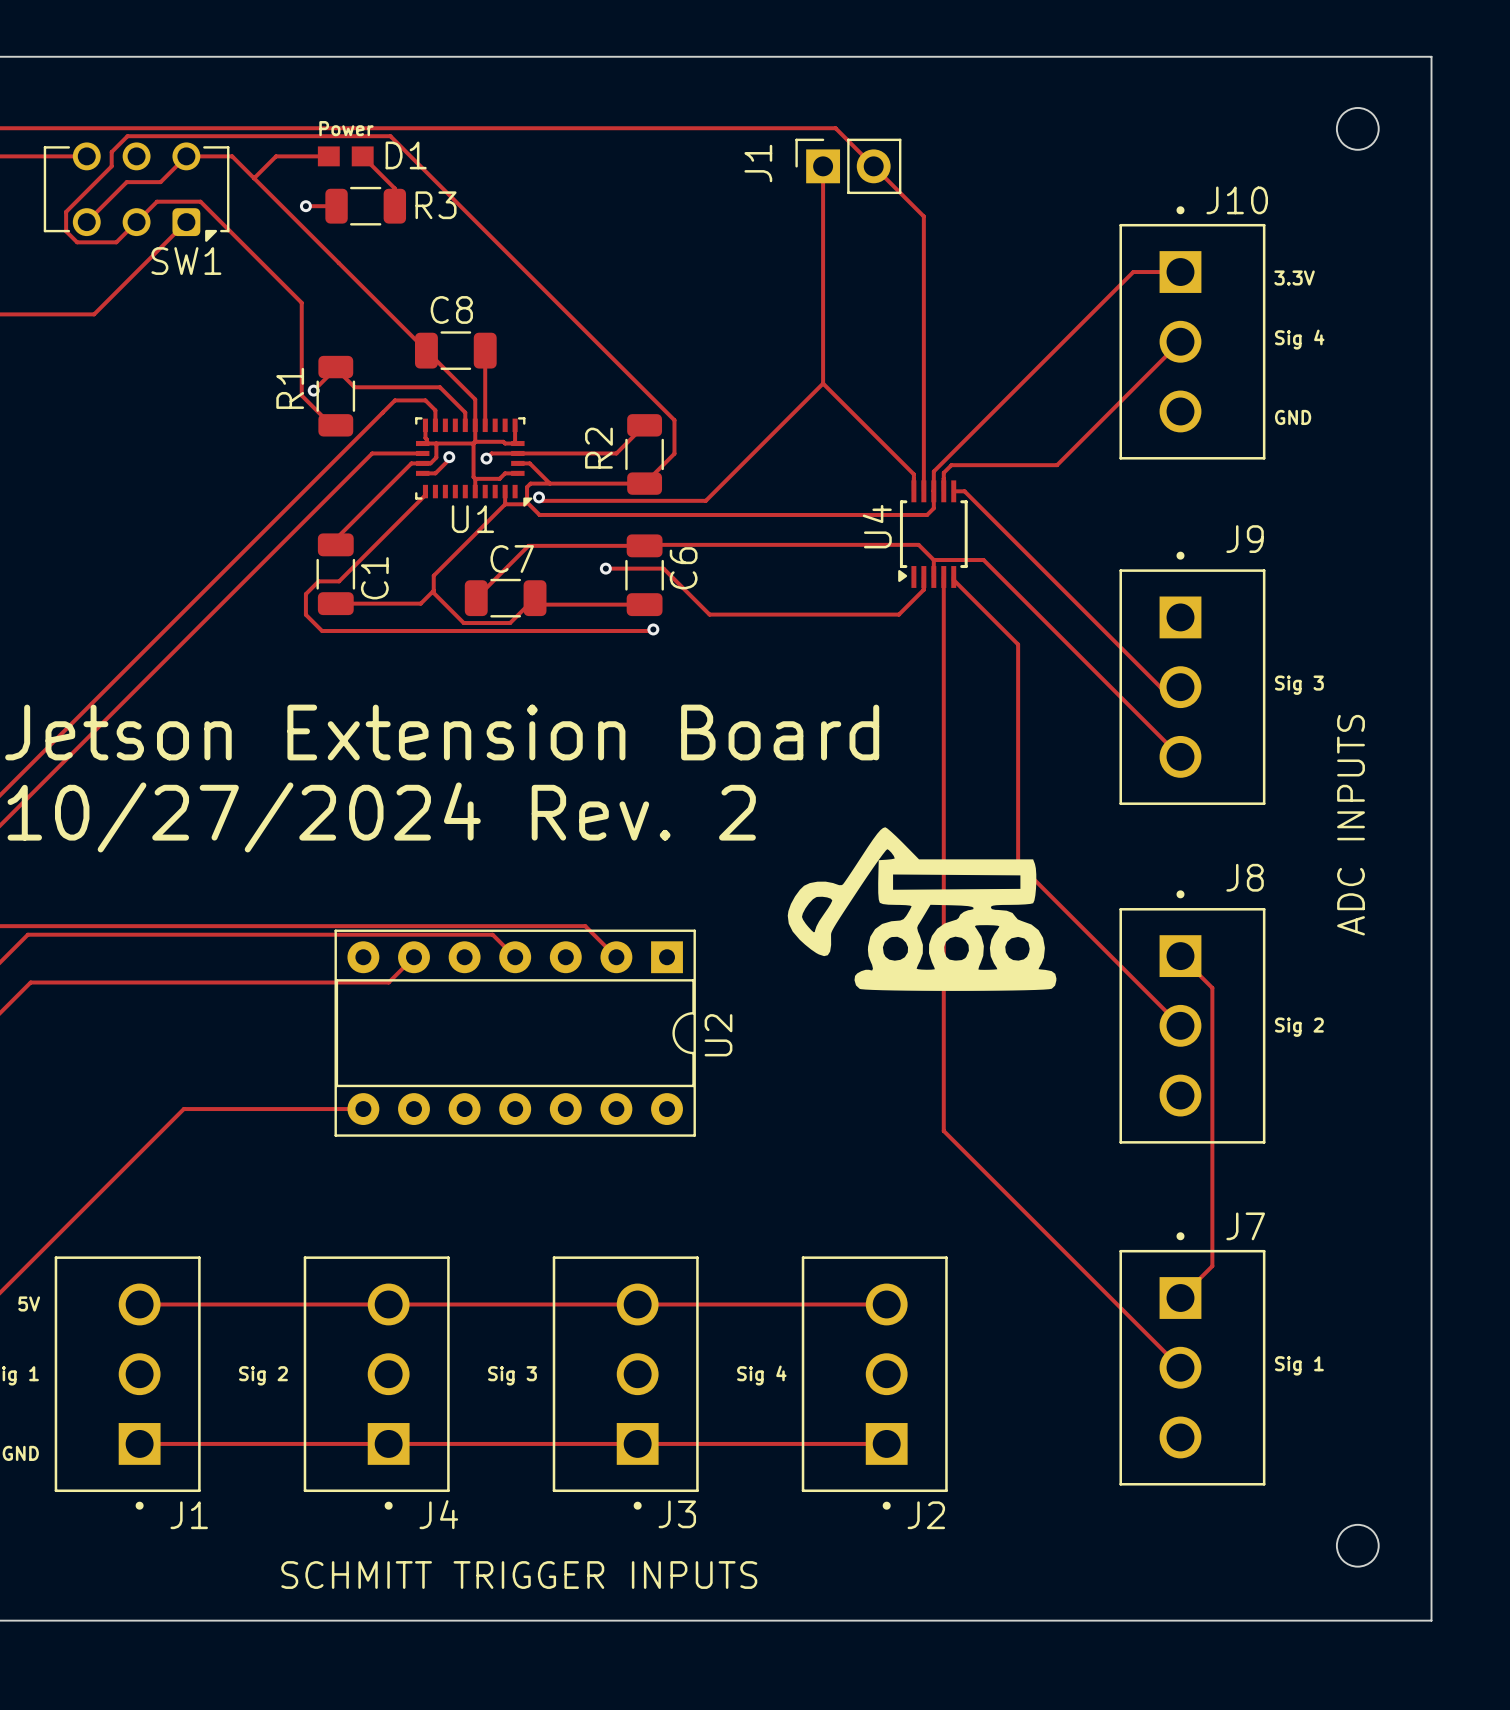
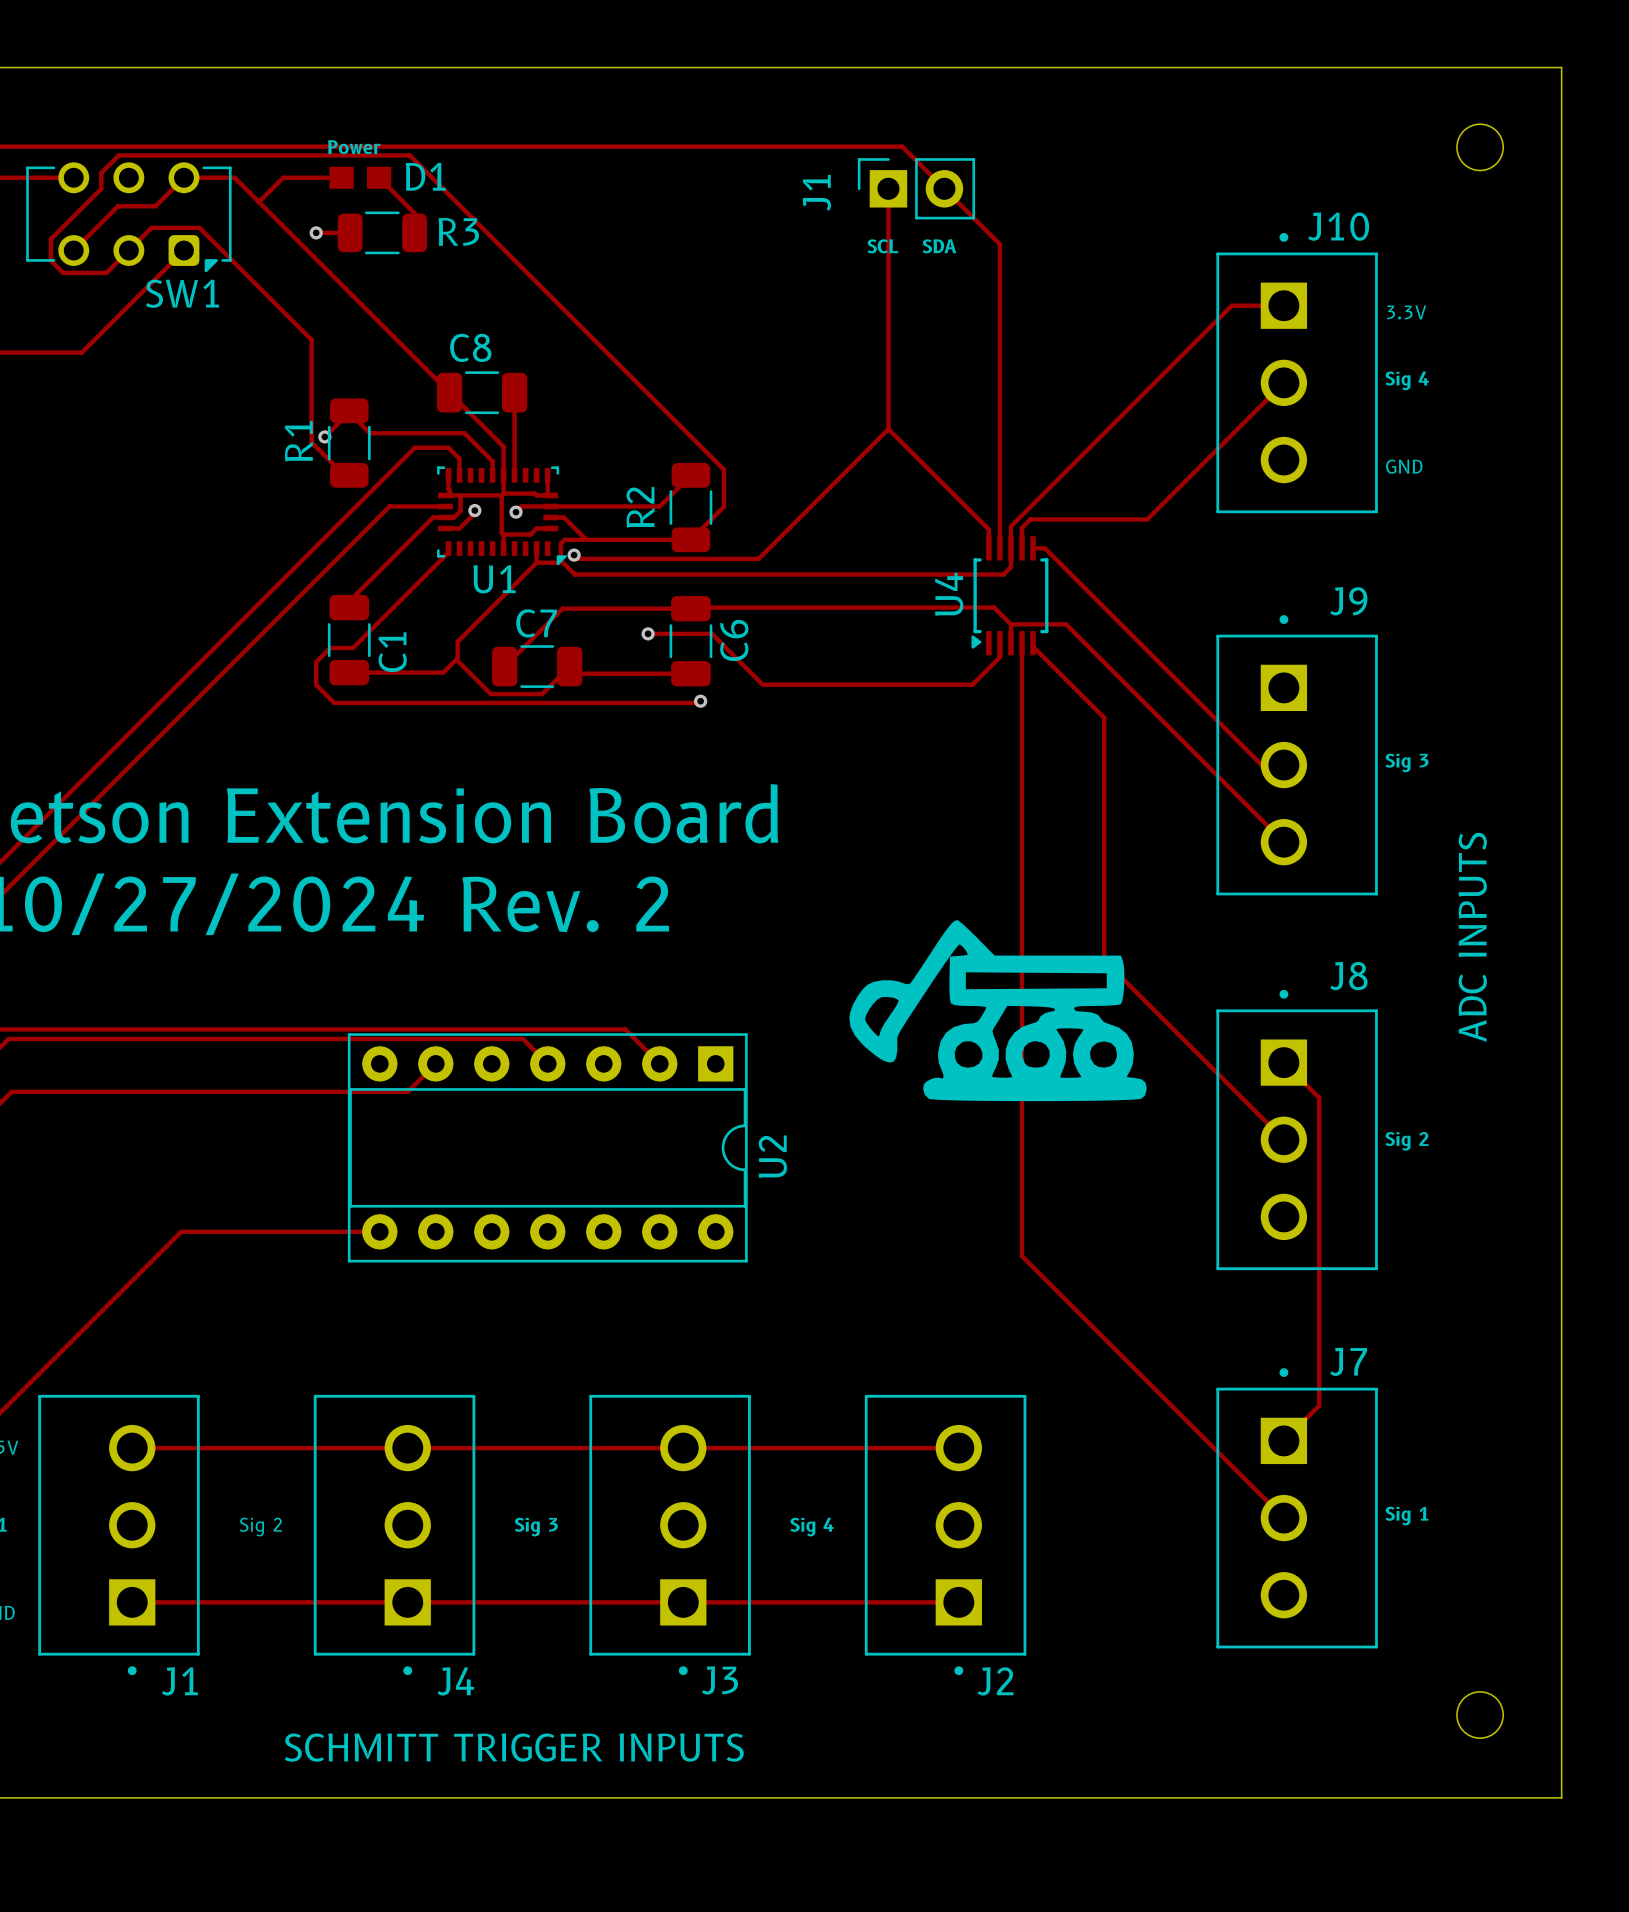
text: none -> SCL (882, 246)
text: none -> SDA (939, 246)

